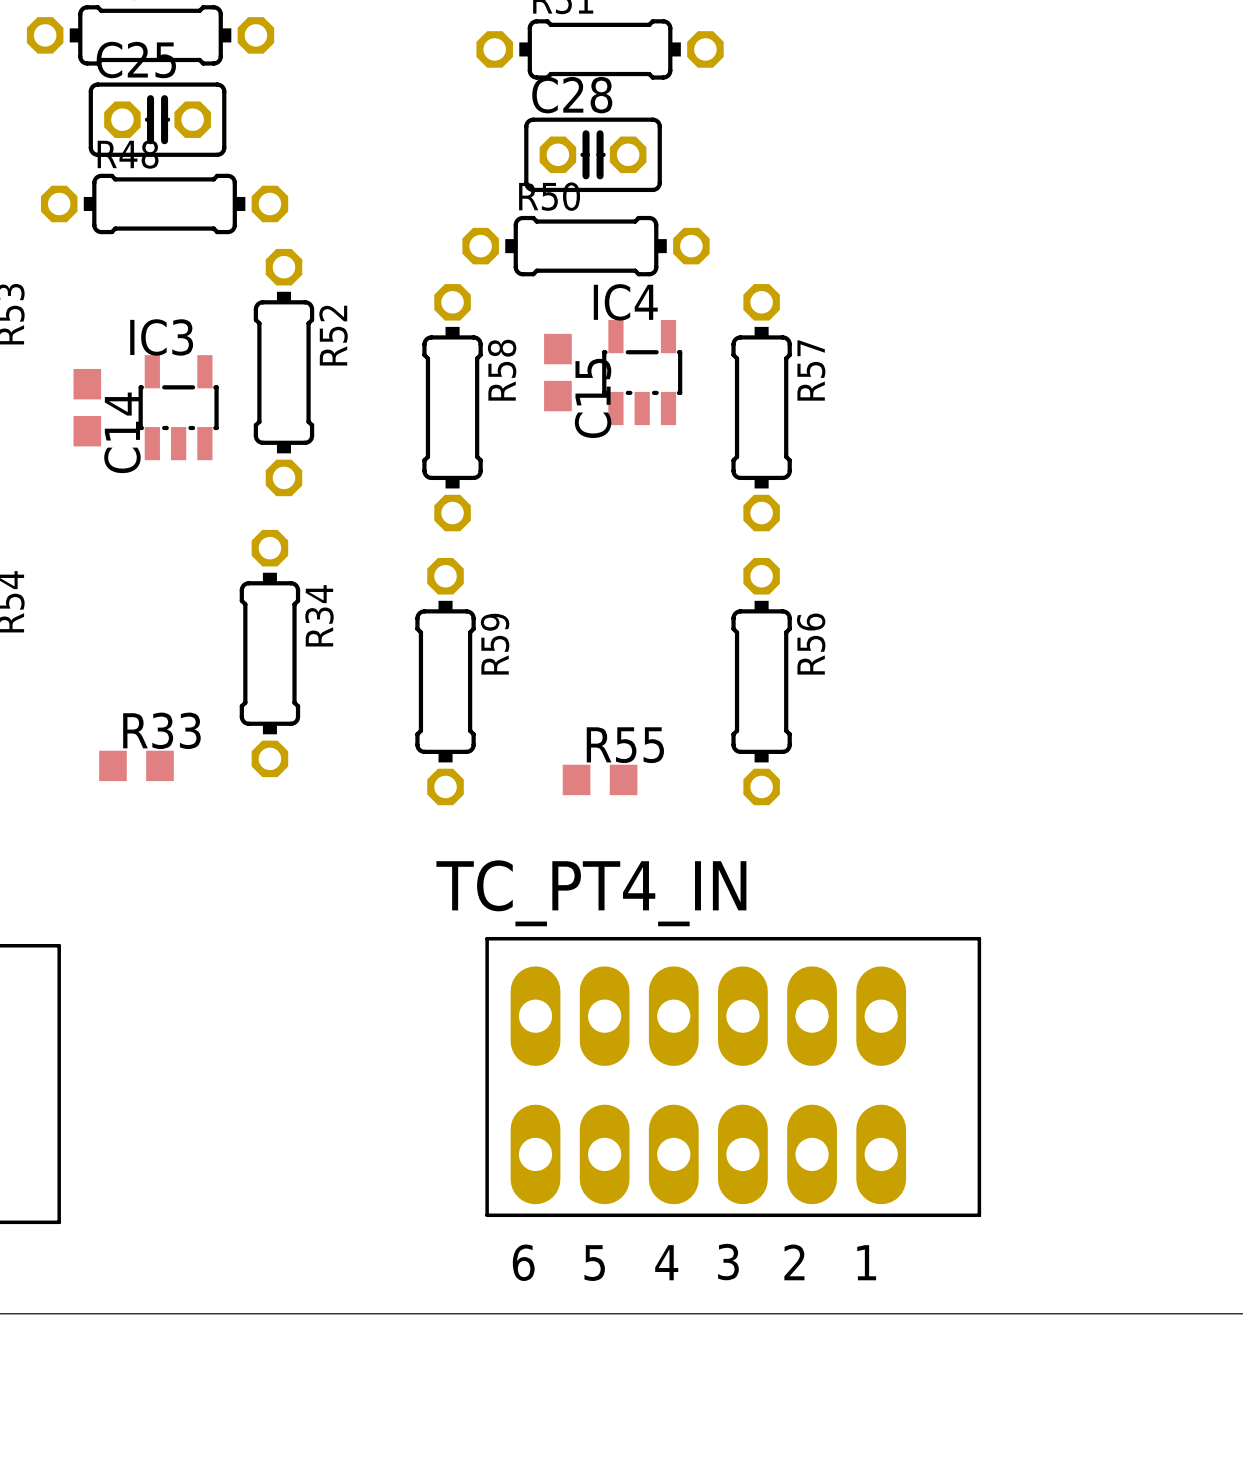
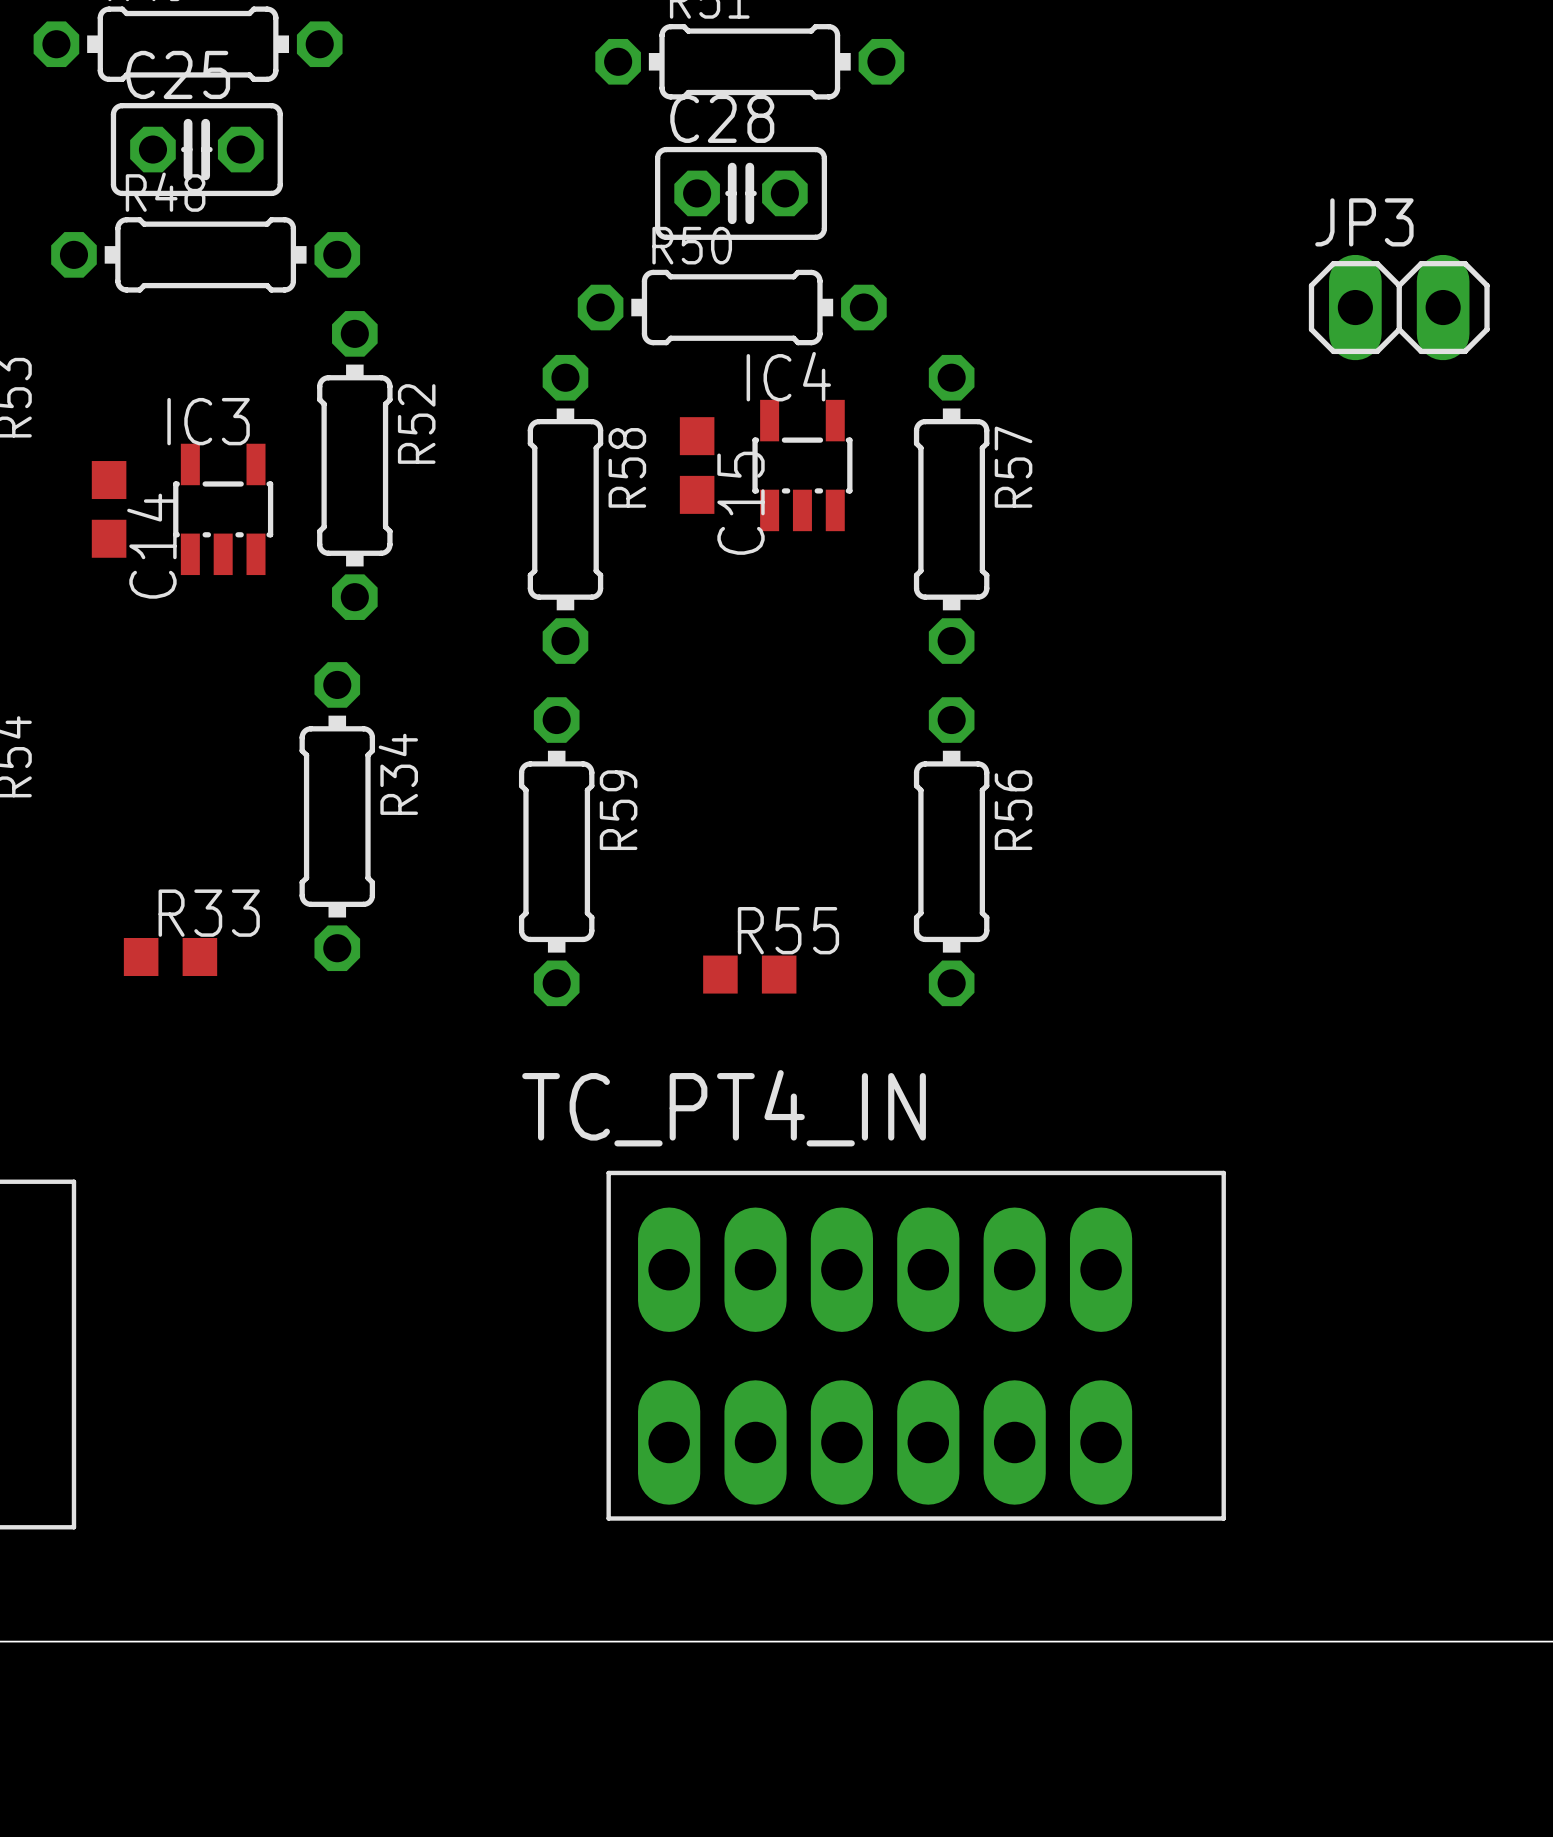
JP3: none -> (1399, 307)
TC_PT4_IN text: 6 (523, 1262) -> none
TC_PT4_IN text: 4 (666, 1262) -> none
TC_PT4_IN text: 3 (728, 1262) -> none
TC_PT4_IN text: 2 (794, 1262) -> none
TC_PT4_IN text: 1 (866, 1262) -> none
TC_PT4_IN text: 5 (594, 1263) -> none

